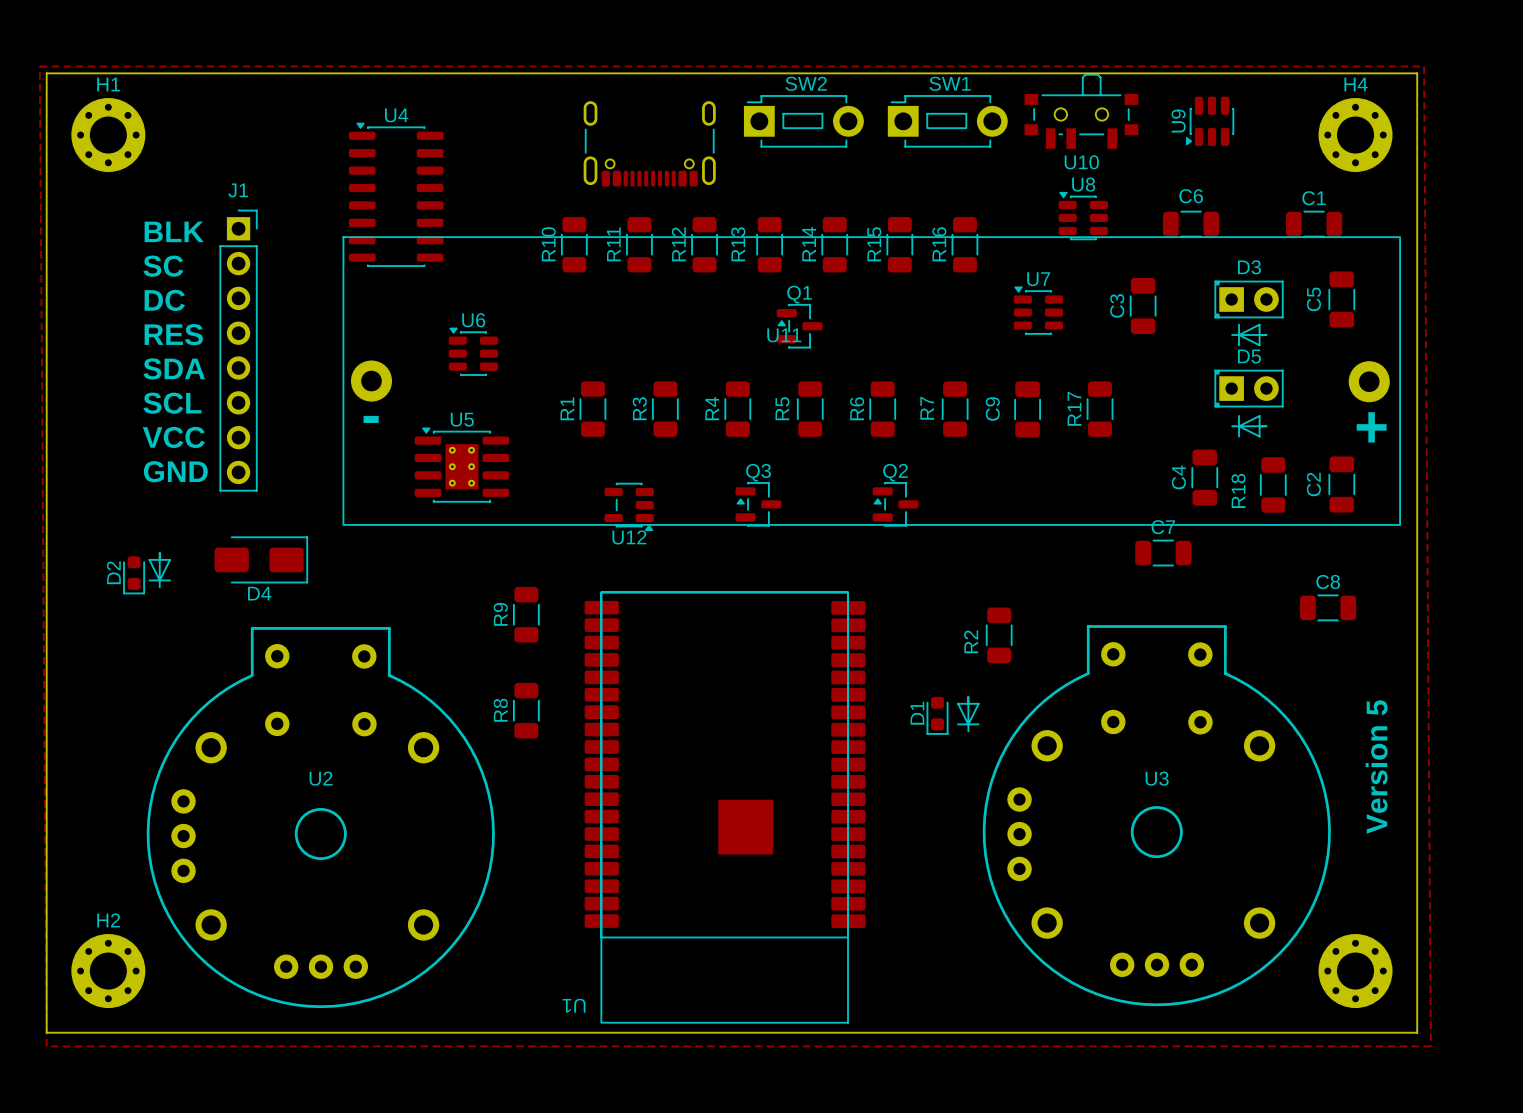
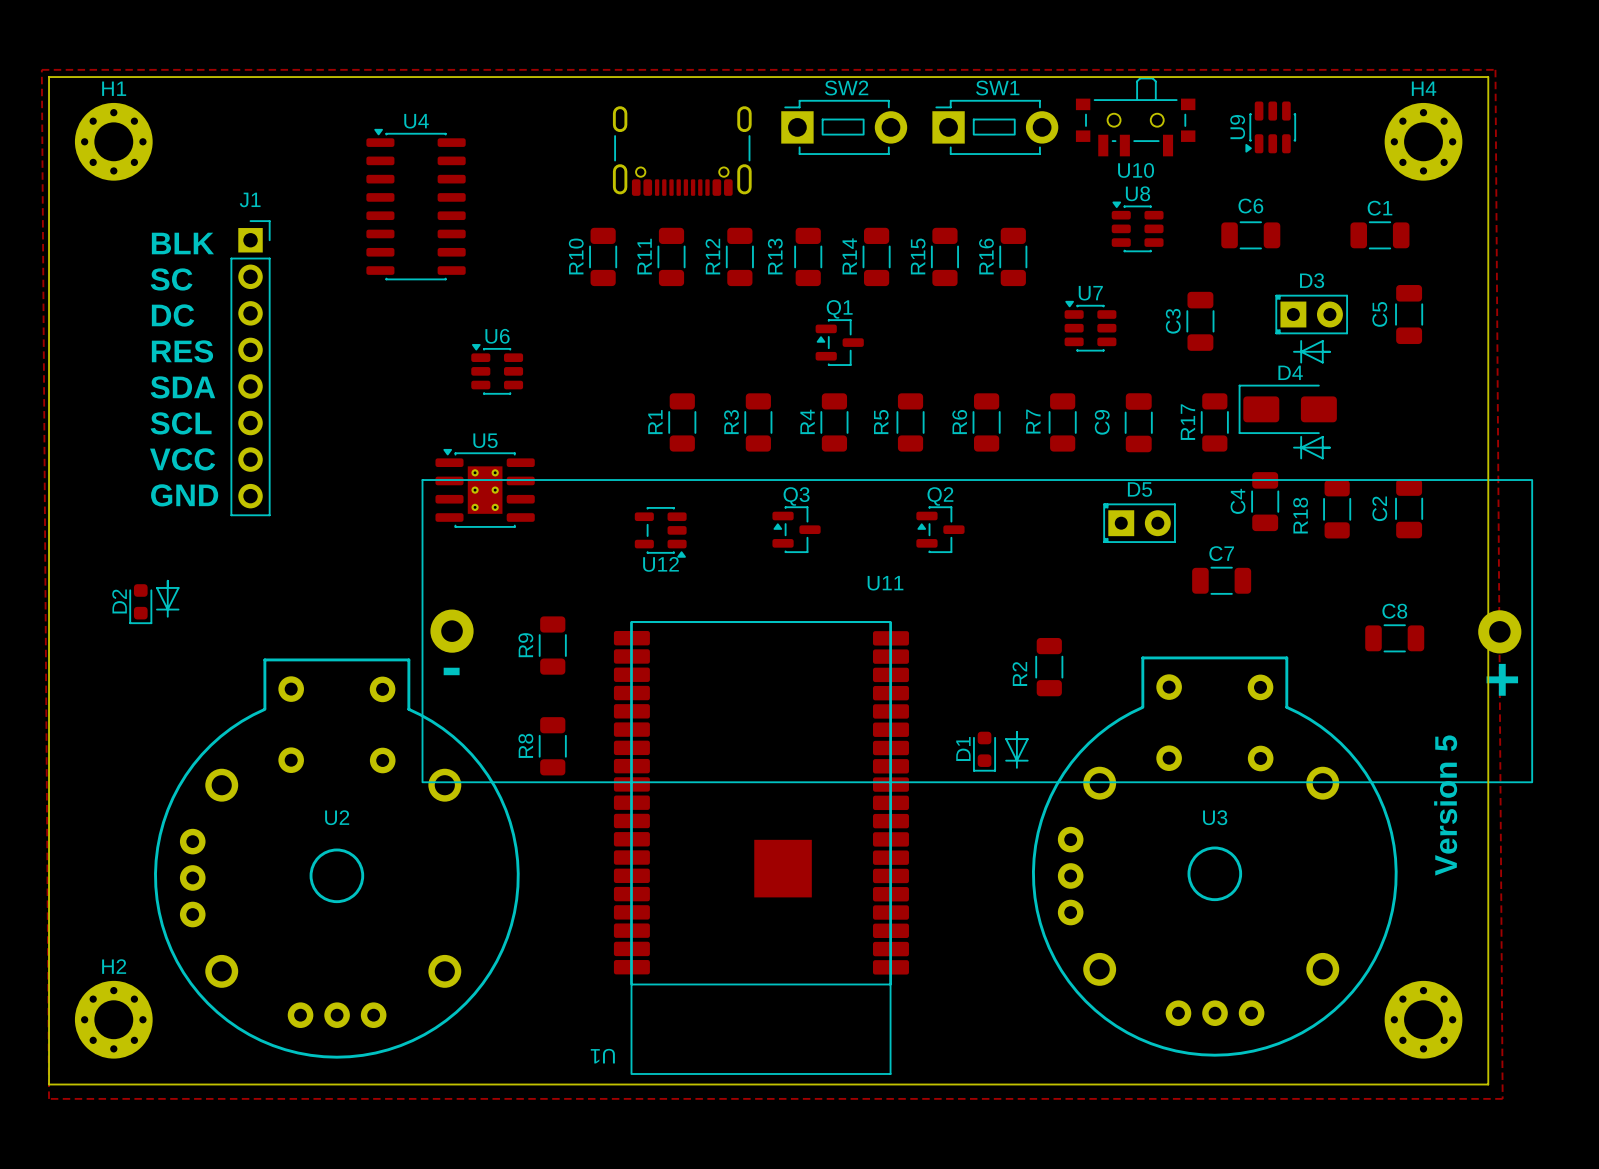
U11 position: (871, 381) -> (977, 631)
D5 position: (1249, 388) -> (1139, 523)
R1 position: (592, 409) -> (682, 422)
R3 position: (665, 409) -> (758, 422)
R4 position: (737, 409) -> (834, 422)
R5 position: (810, 409) -> (910, 422)
R6 position: (882, 409) -> (986, 422)
R7 position: (955, 409) -> (1062, 422)
C9 position: (1027, 409) -> (1138, 422)
R17 position: (1100, 409) -> (1214, 422)
D4 rotation: 0° (261, 559) -> 180° (1287, 409)
D4 position: (261, 559) -> (1287, 409)

